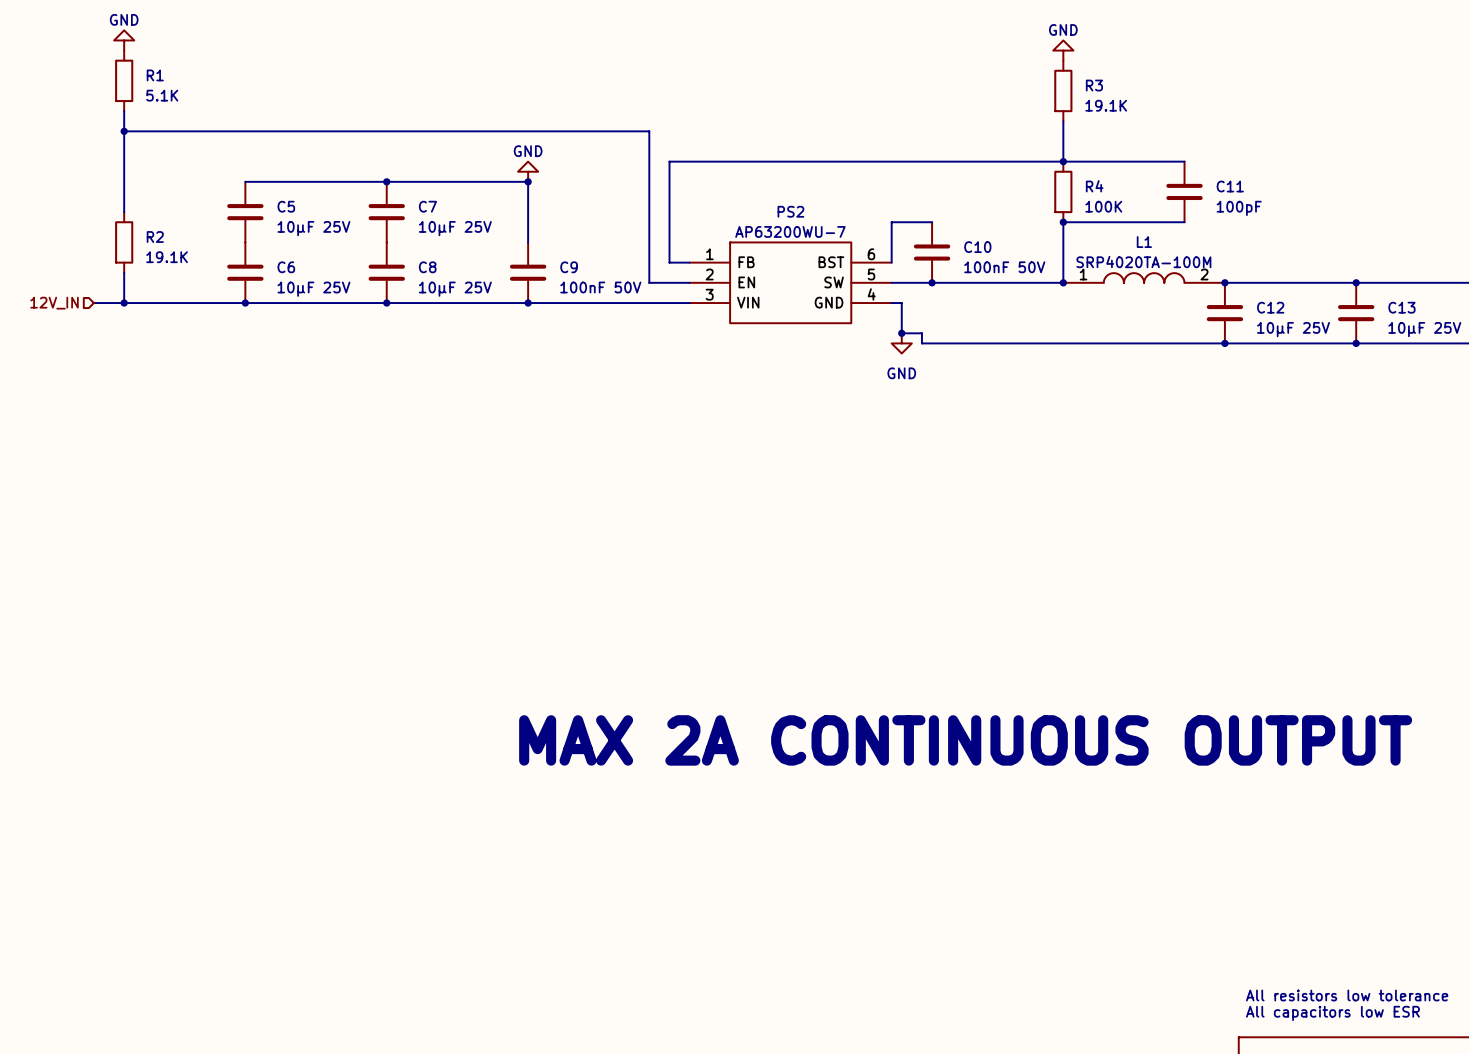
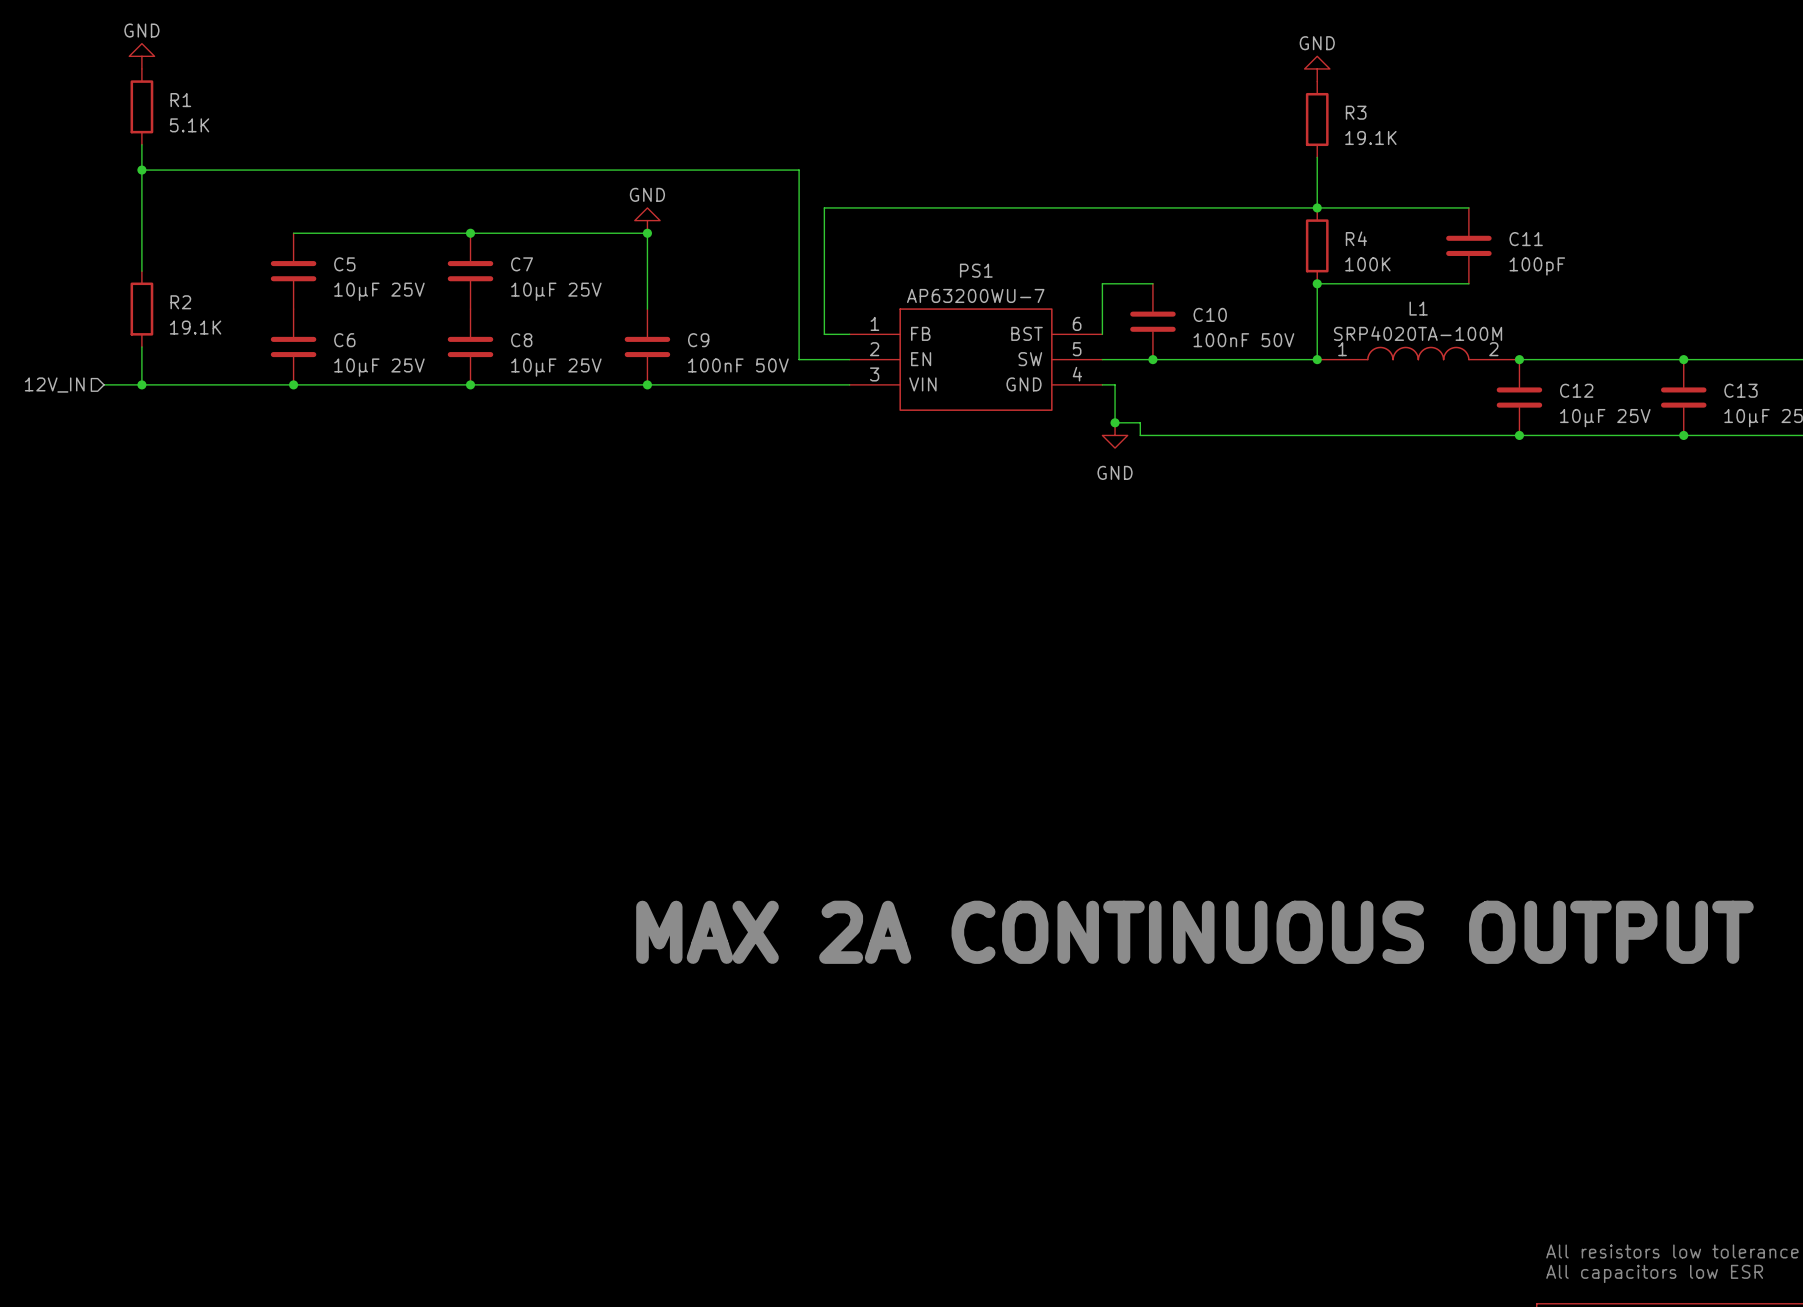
PS2 name: PS2 (790, 211) -> PS1 (976, 270)

